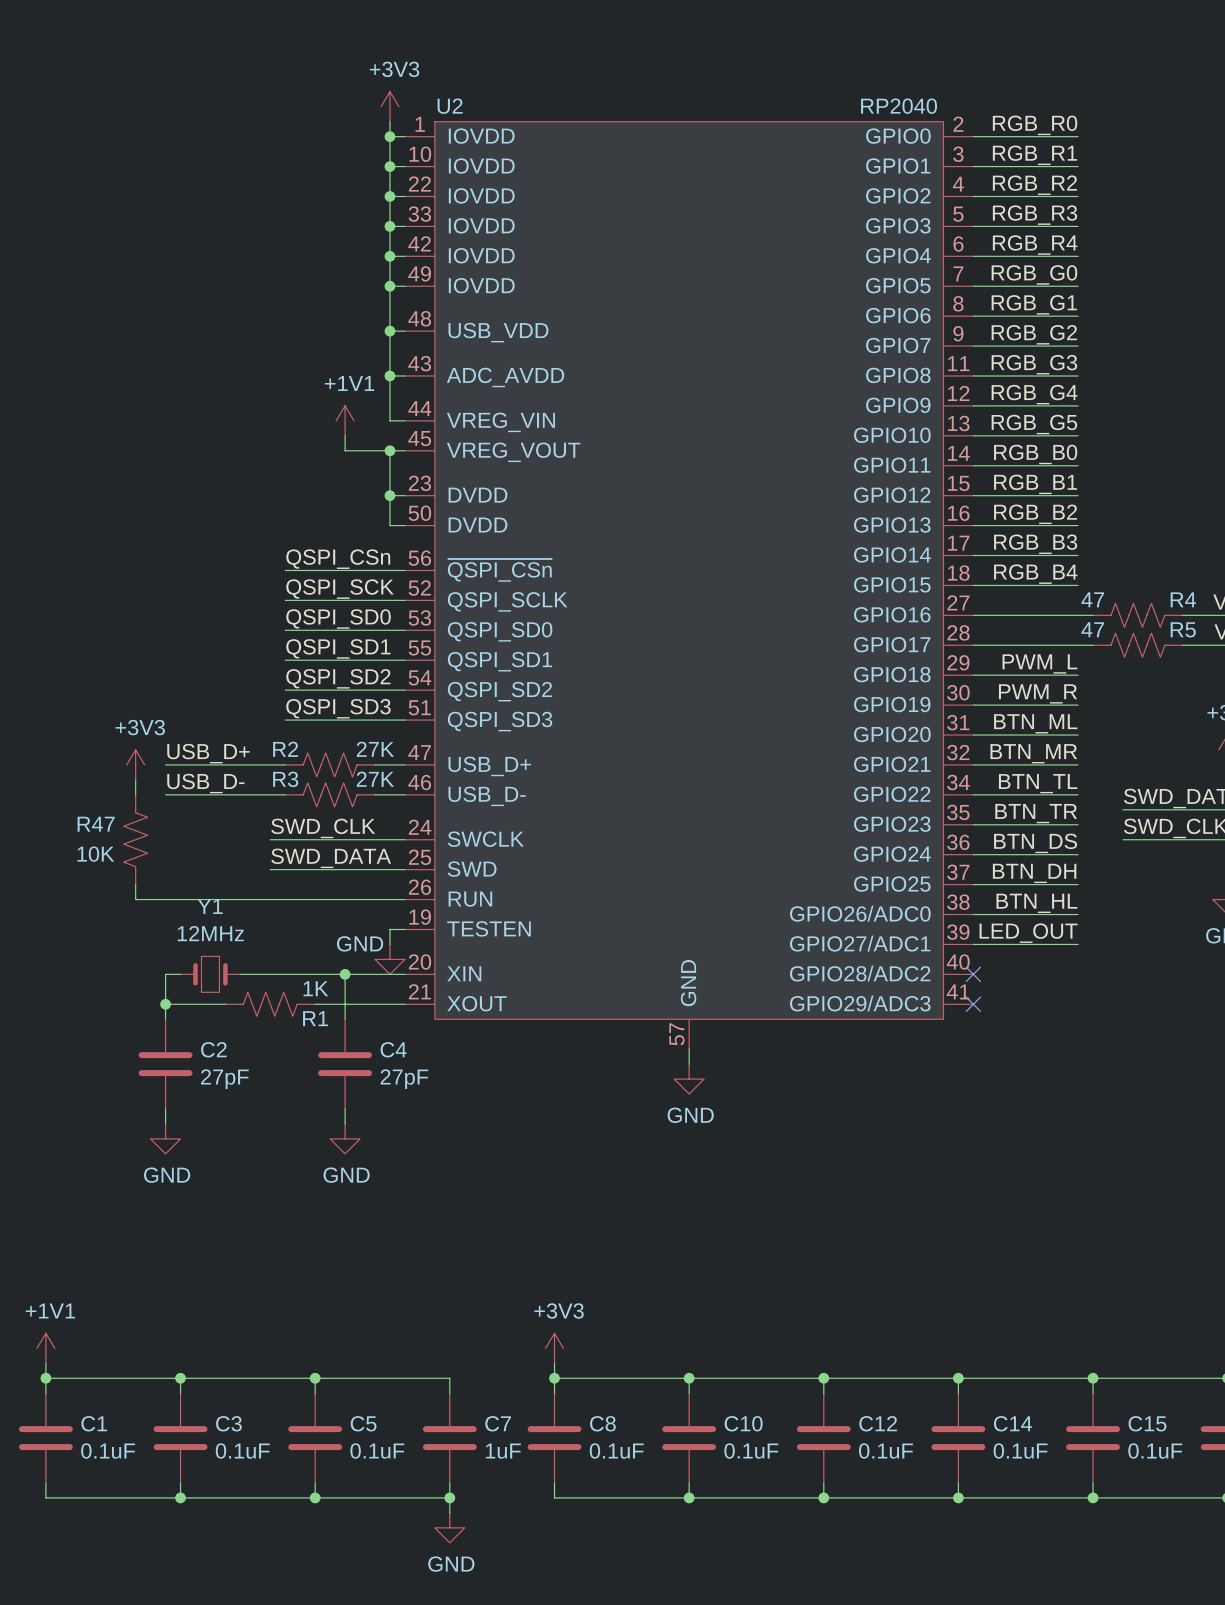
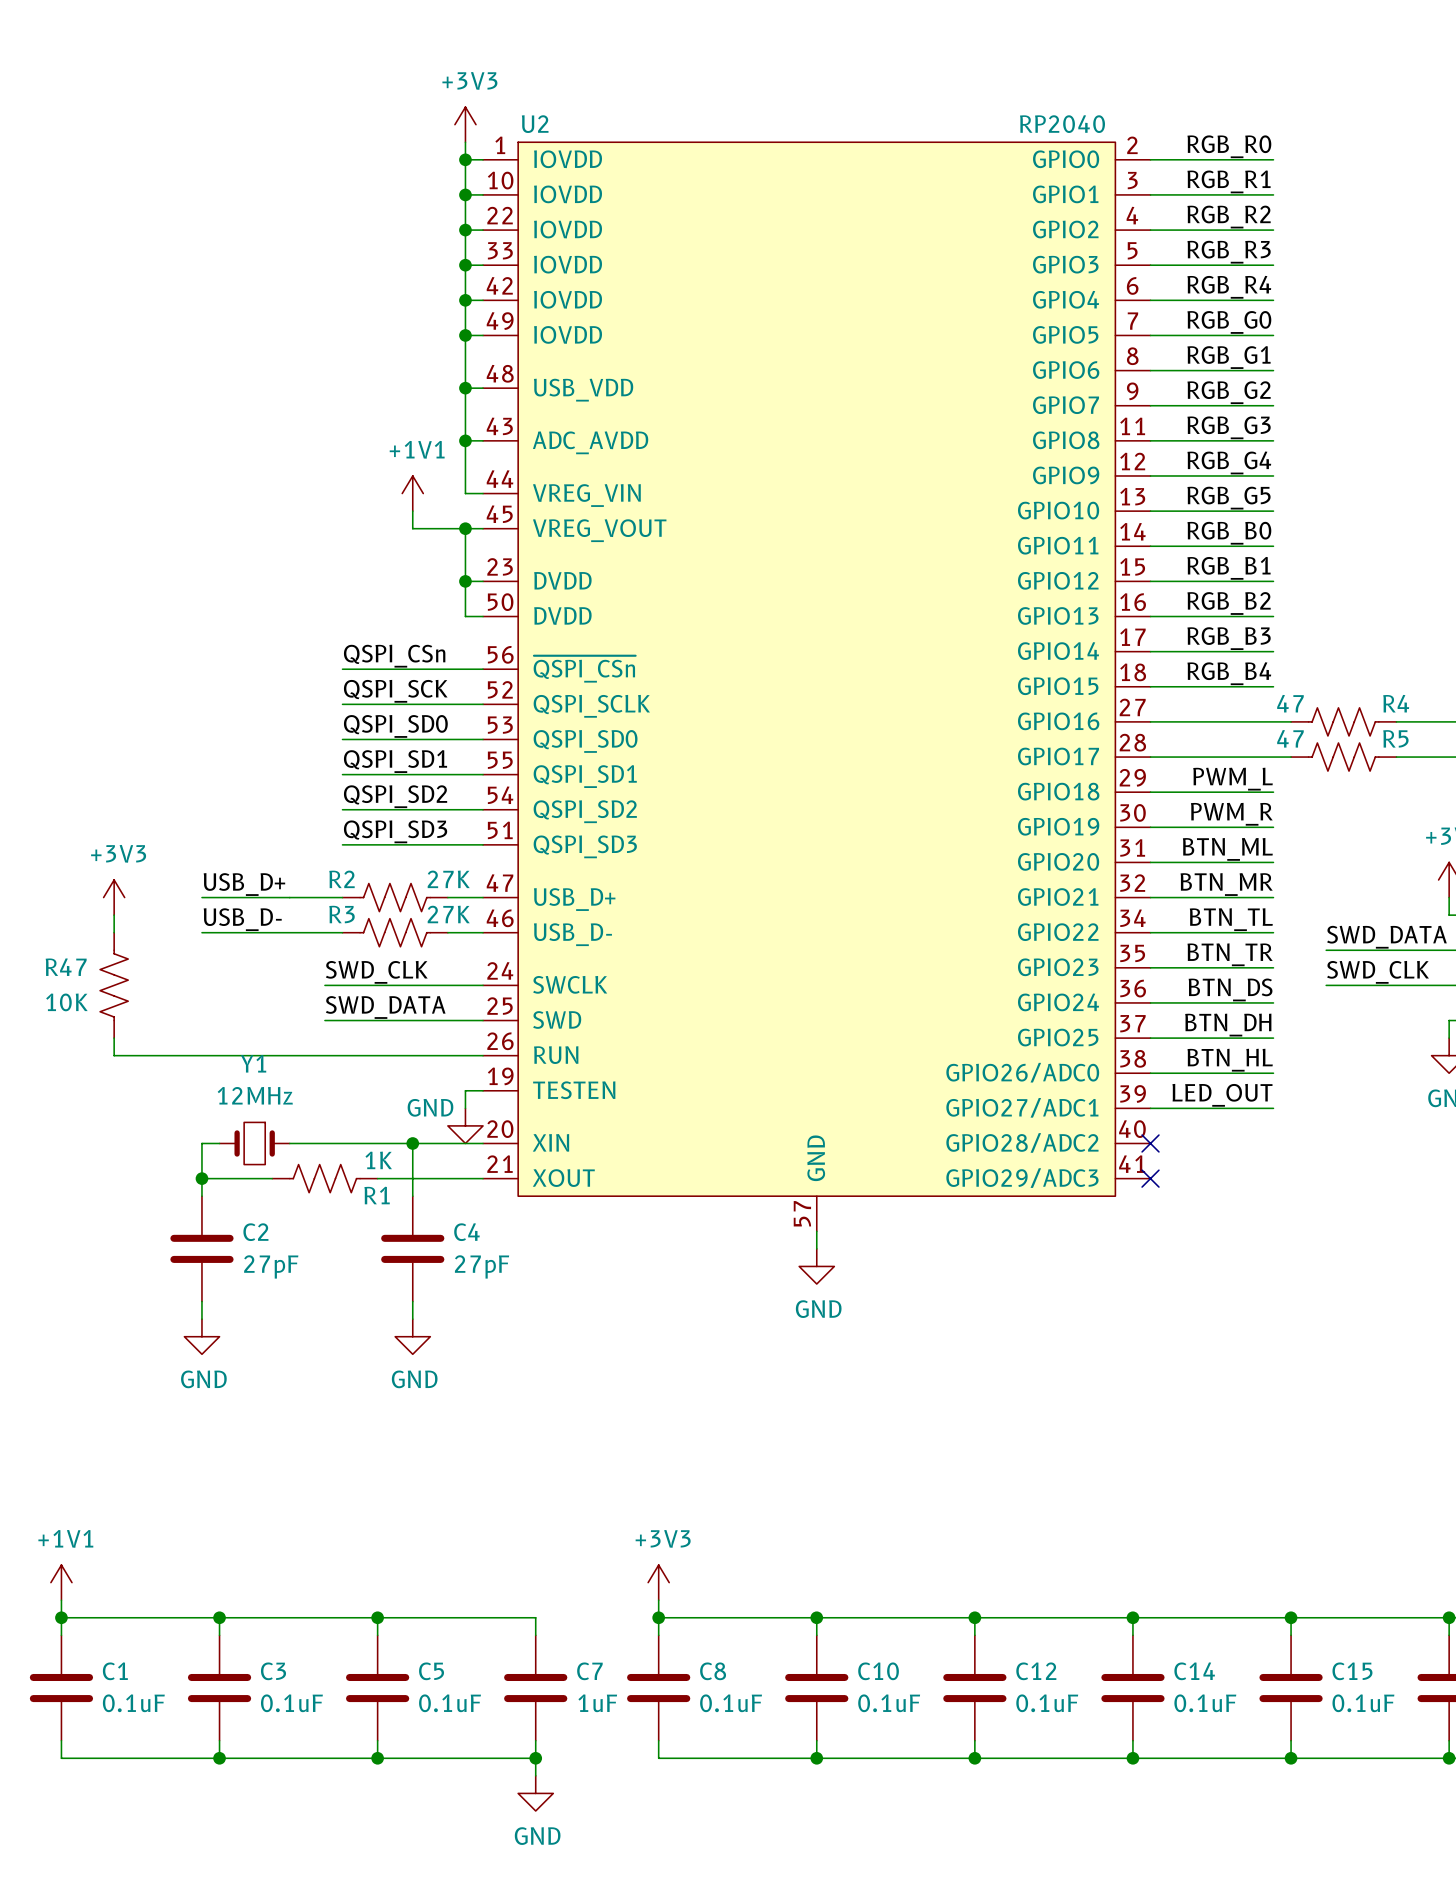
power symbol position: +3V3 (135, 764) -> +3V3 (114, 897)
wire: (135, 779) (135, 794) -> (114, 915) (114, 932)
R47 position: (135, 839) -> (114, 985)
wire: (135, 884) (135, 899) -> (114, 1038) (114, 1055) (166, 1055)

